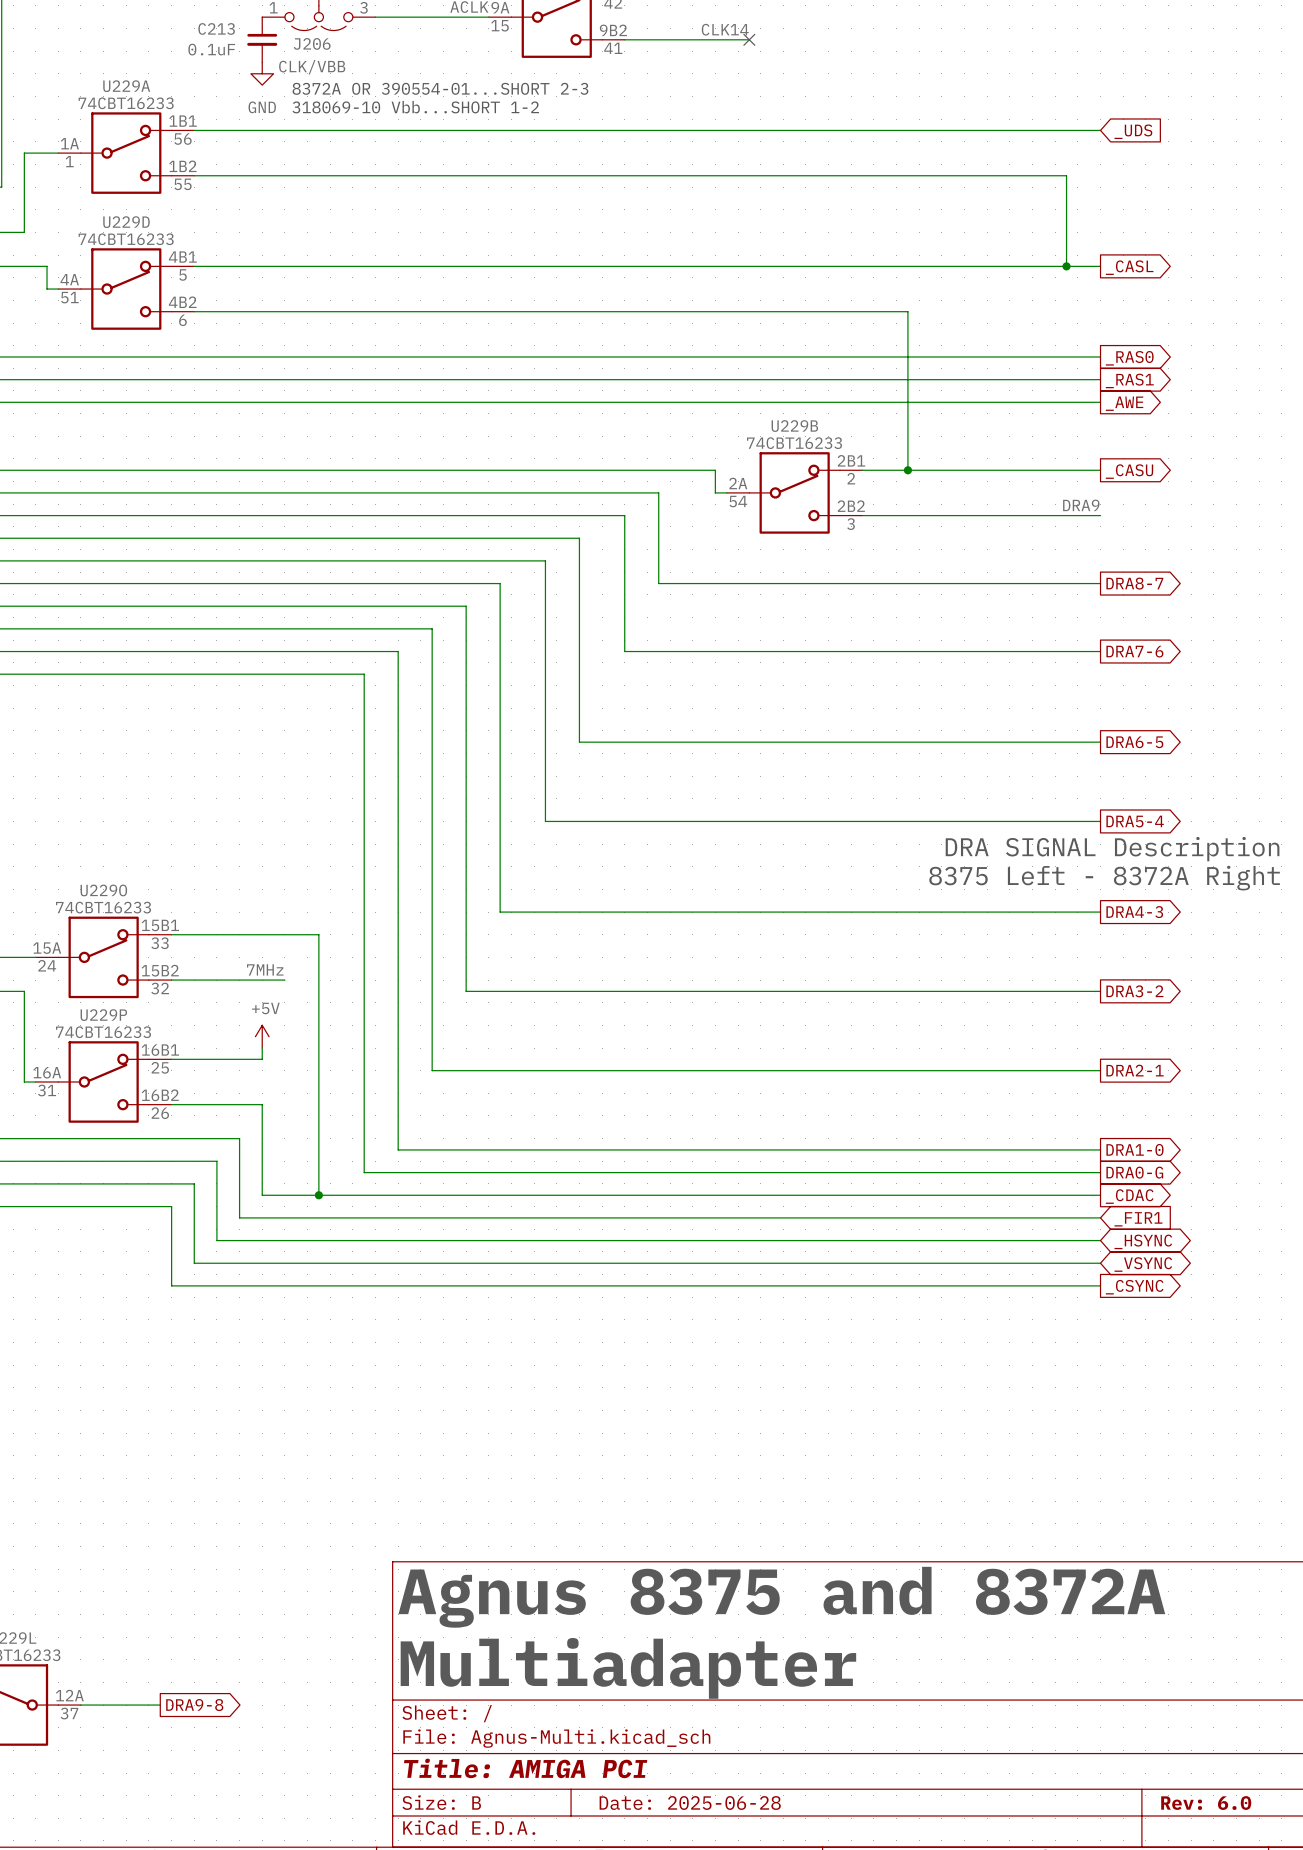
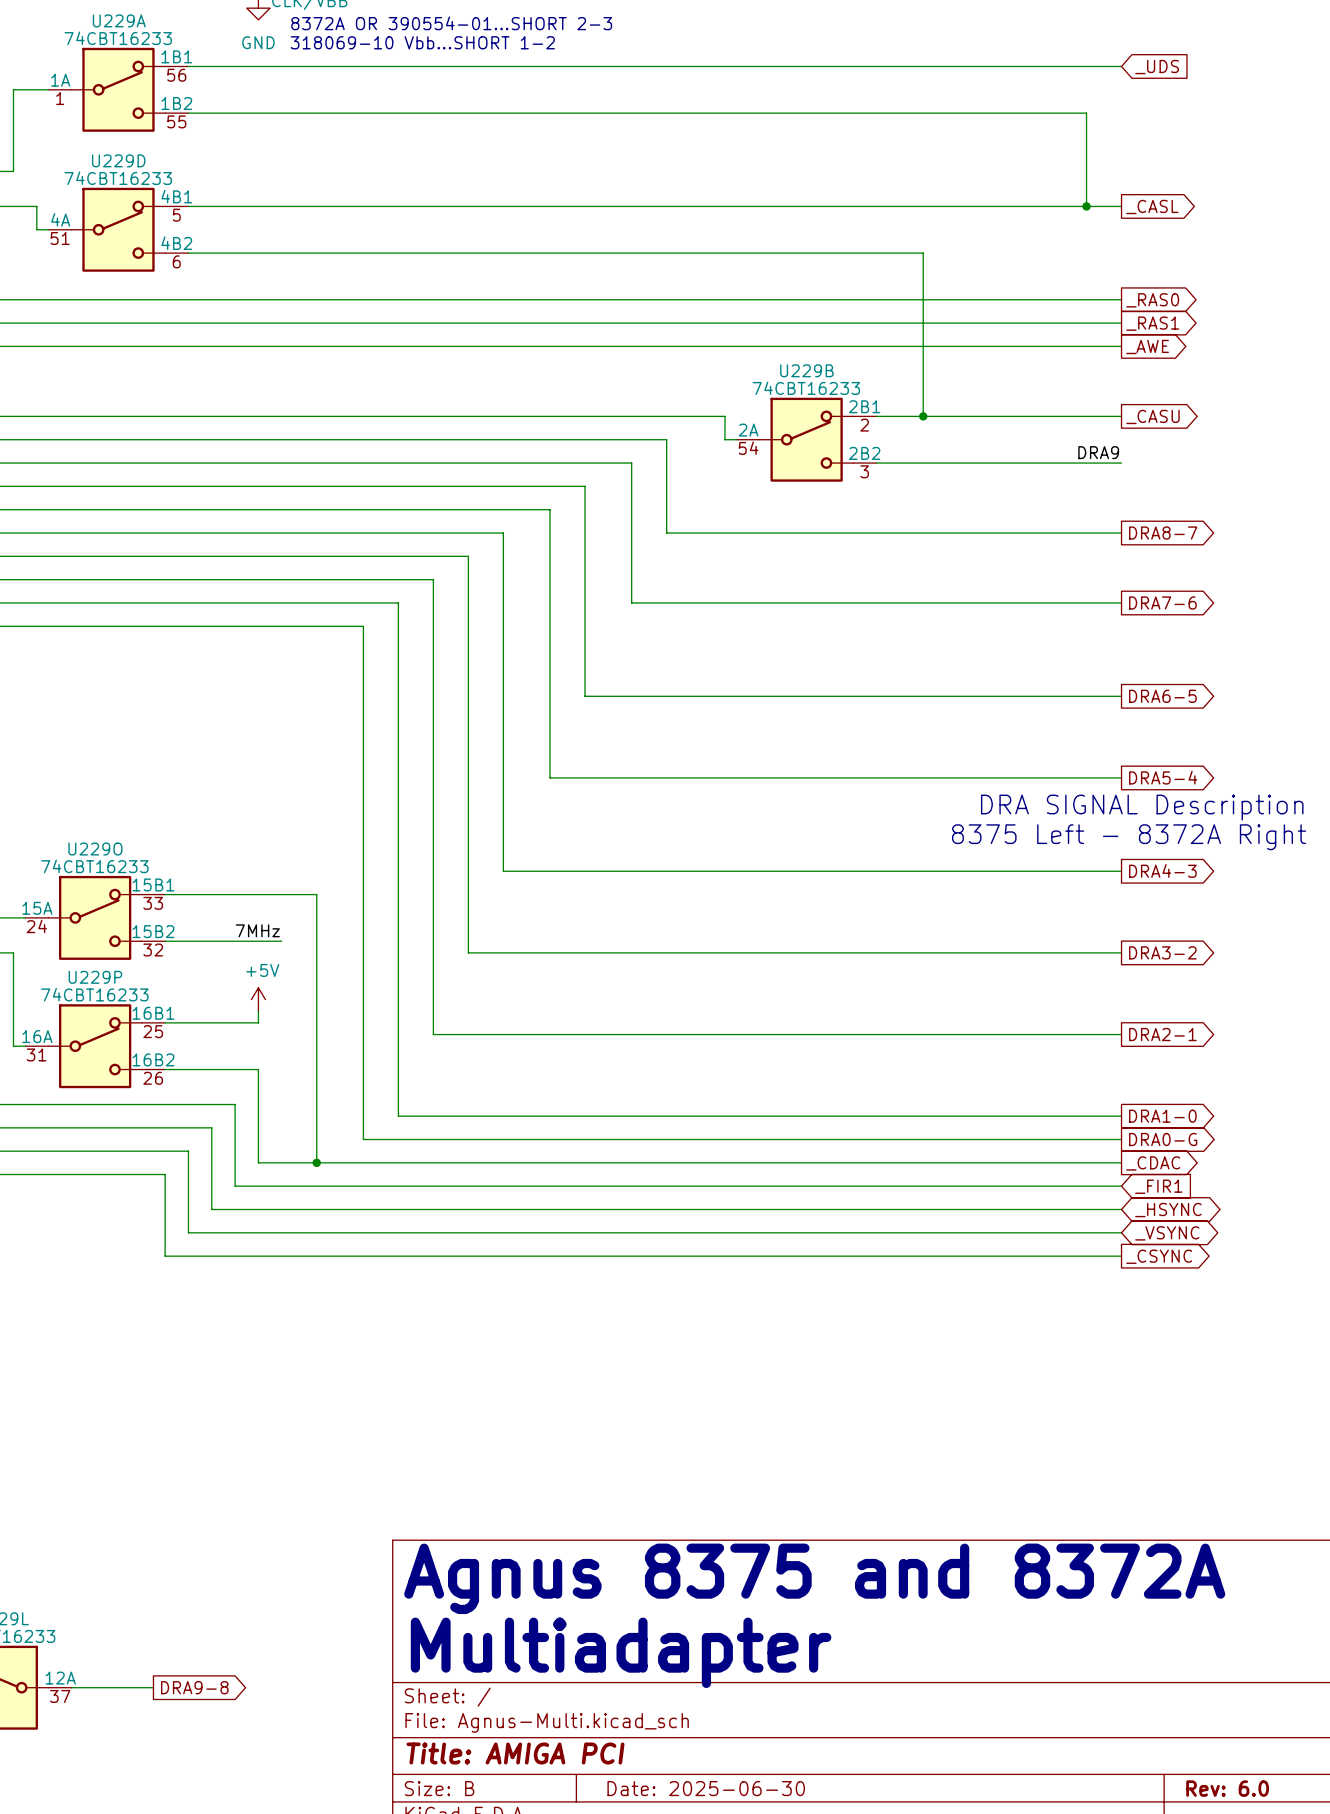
title block: Date: 2025-06-28 (690, 1803) -> Date: 2025-06-30 (706, 1788)

